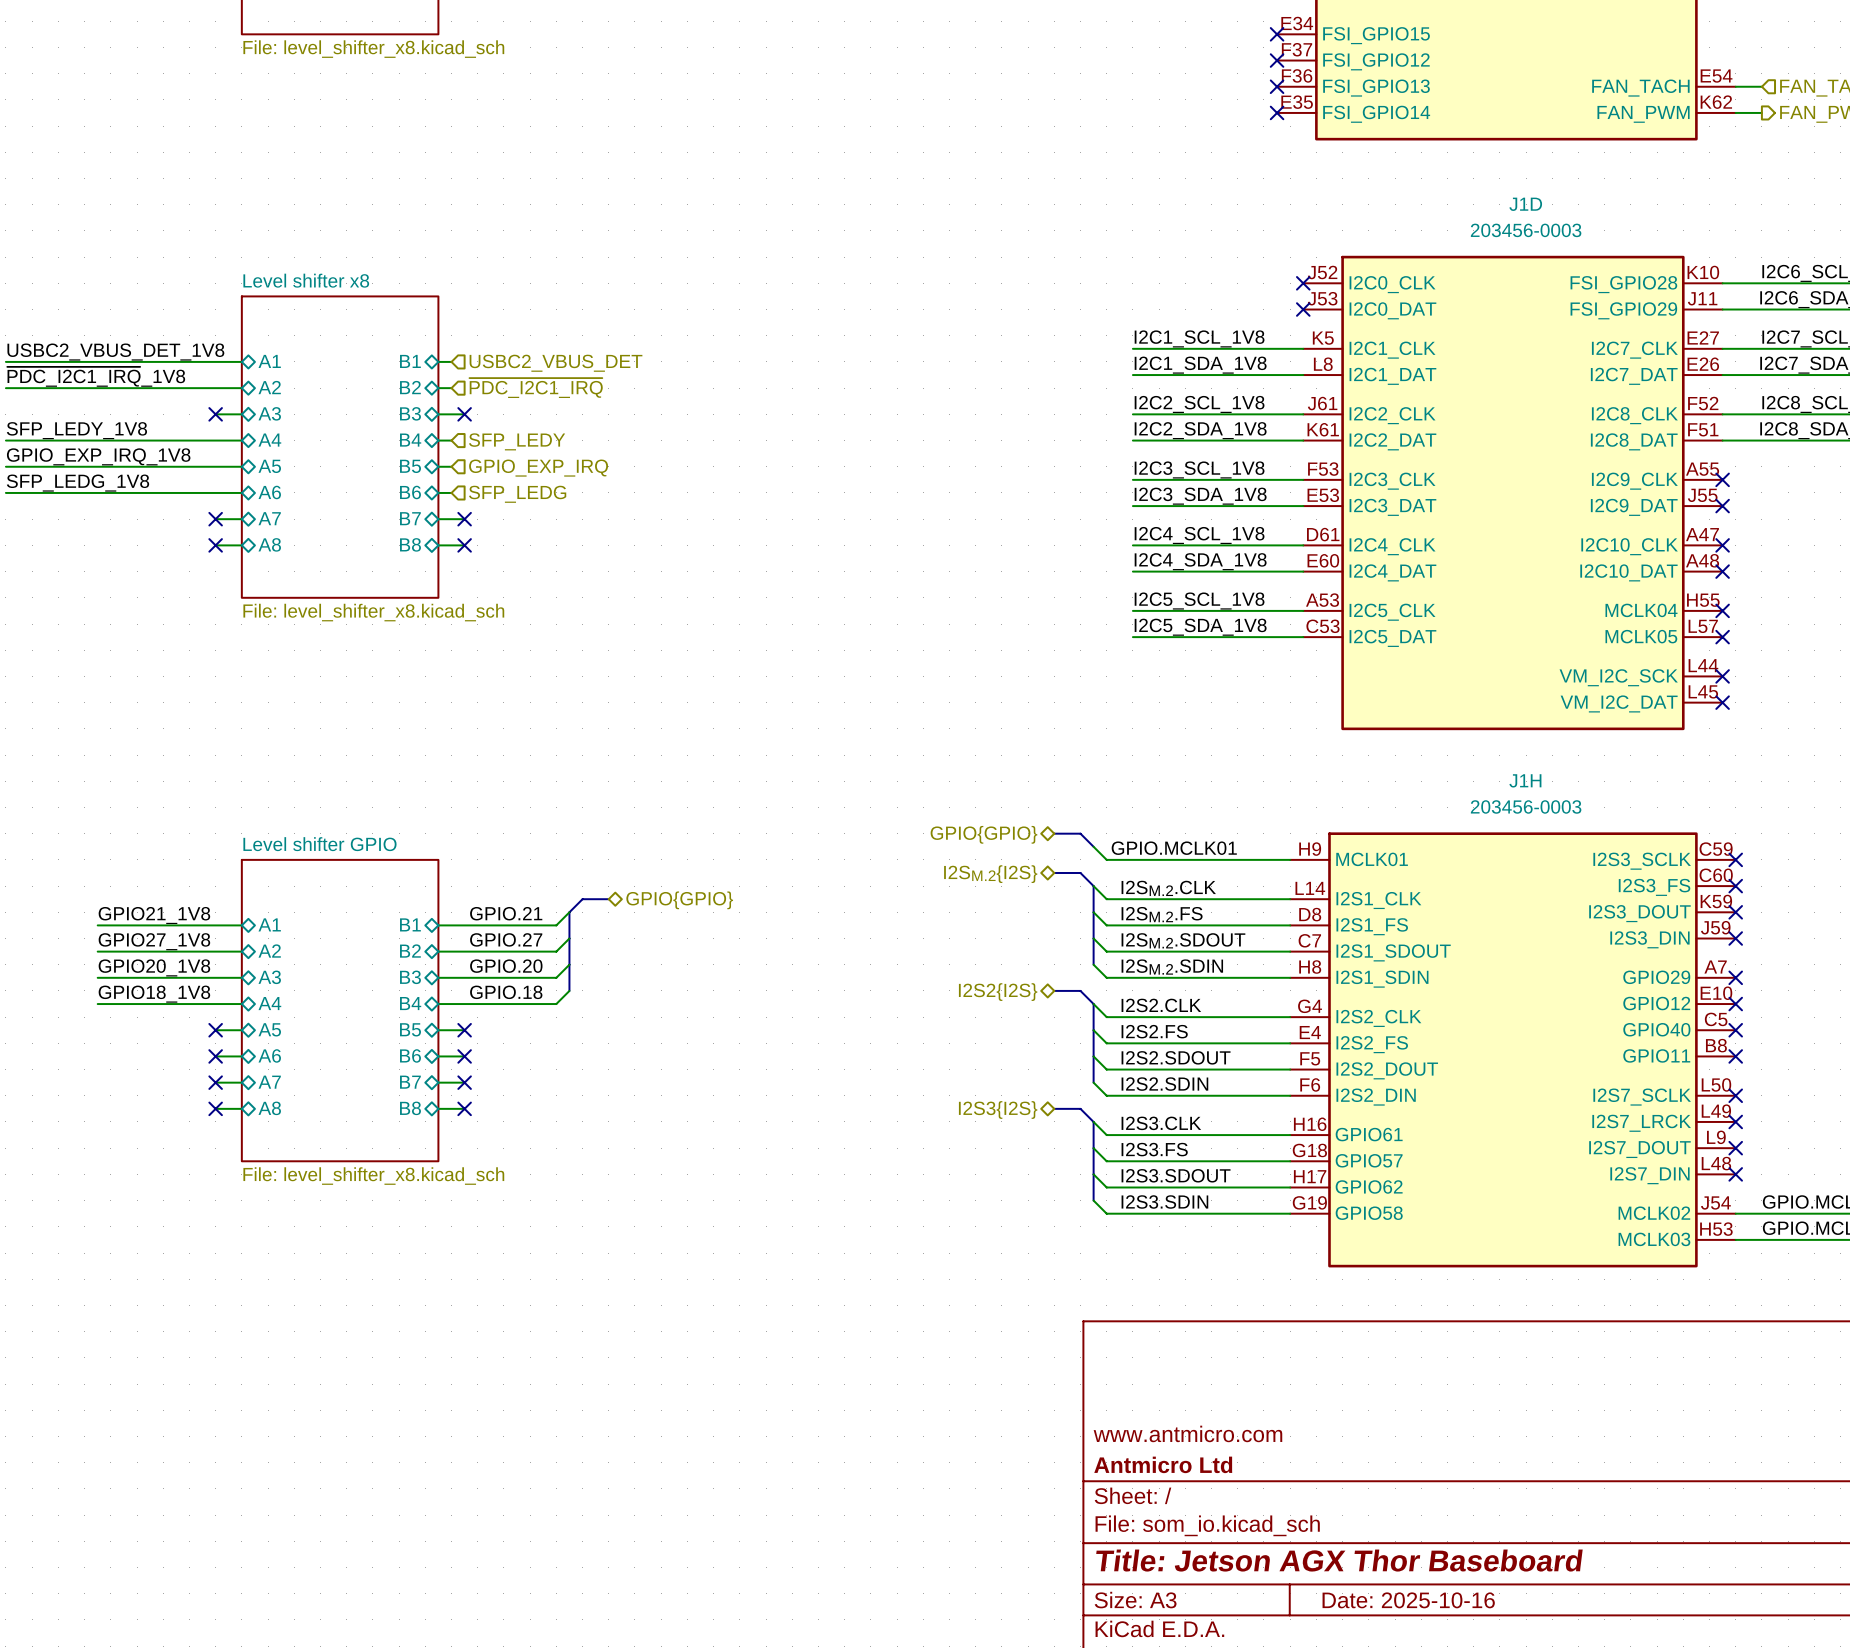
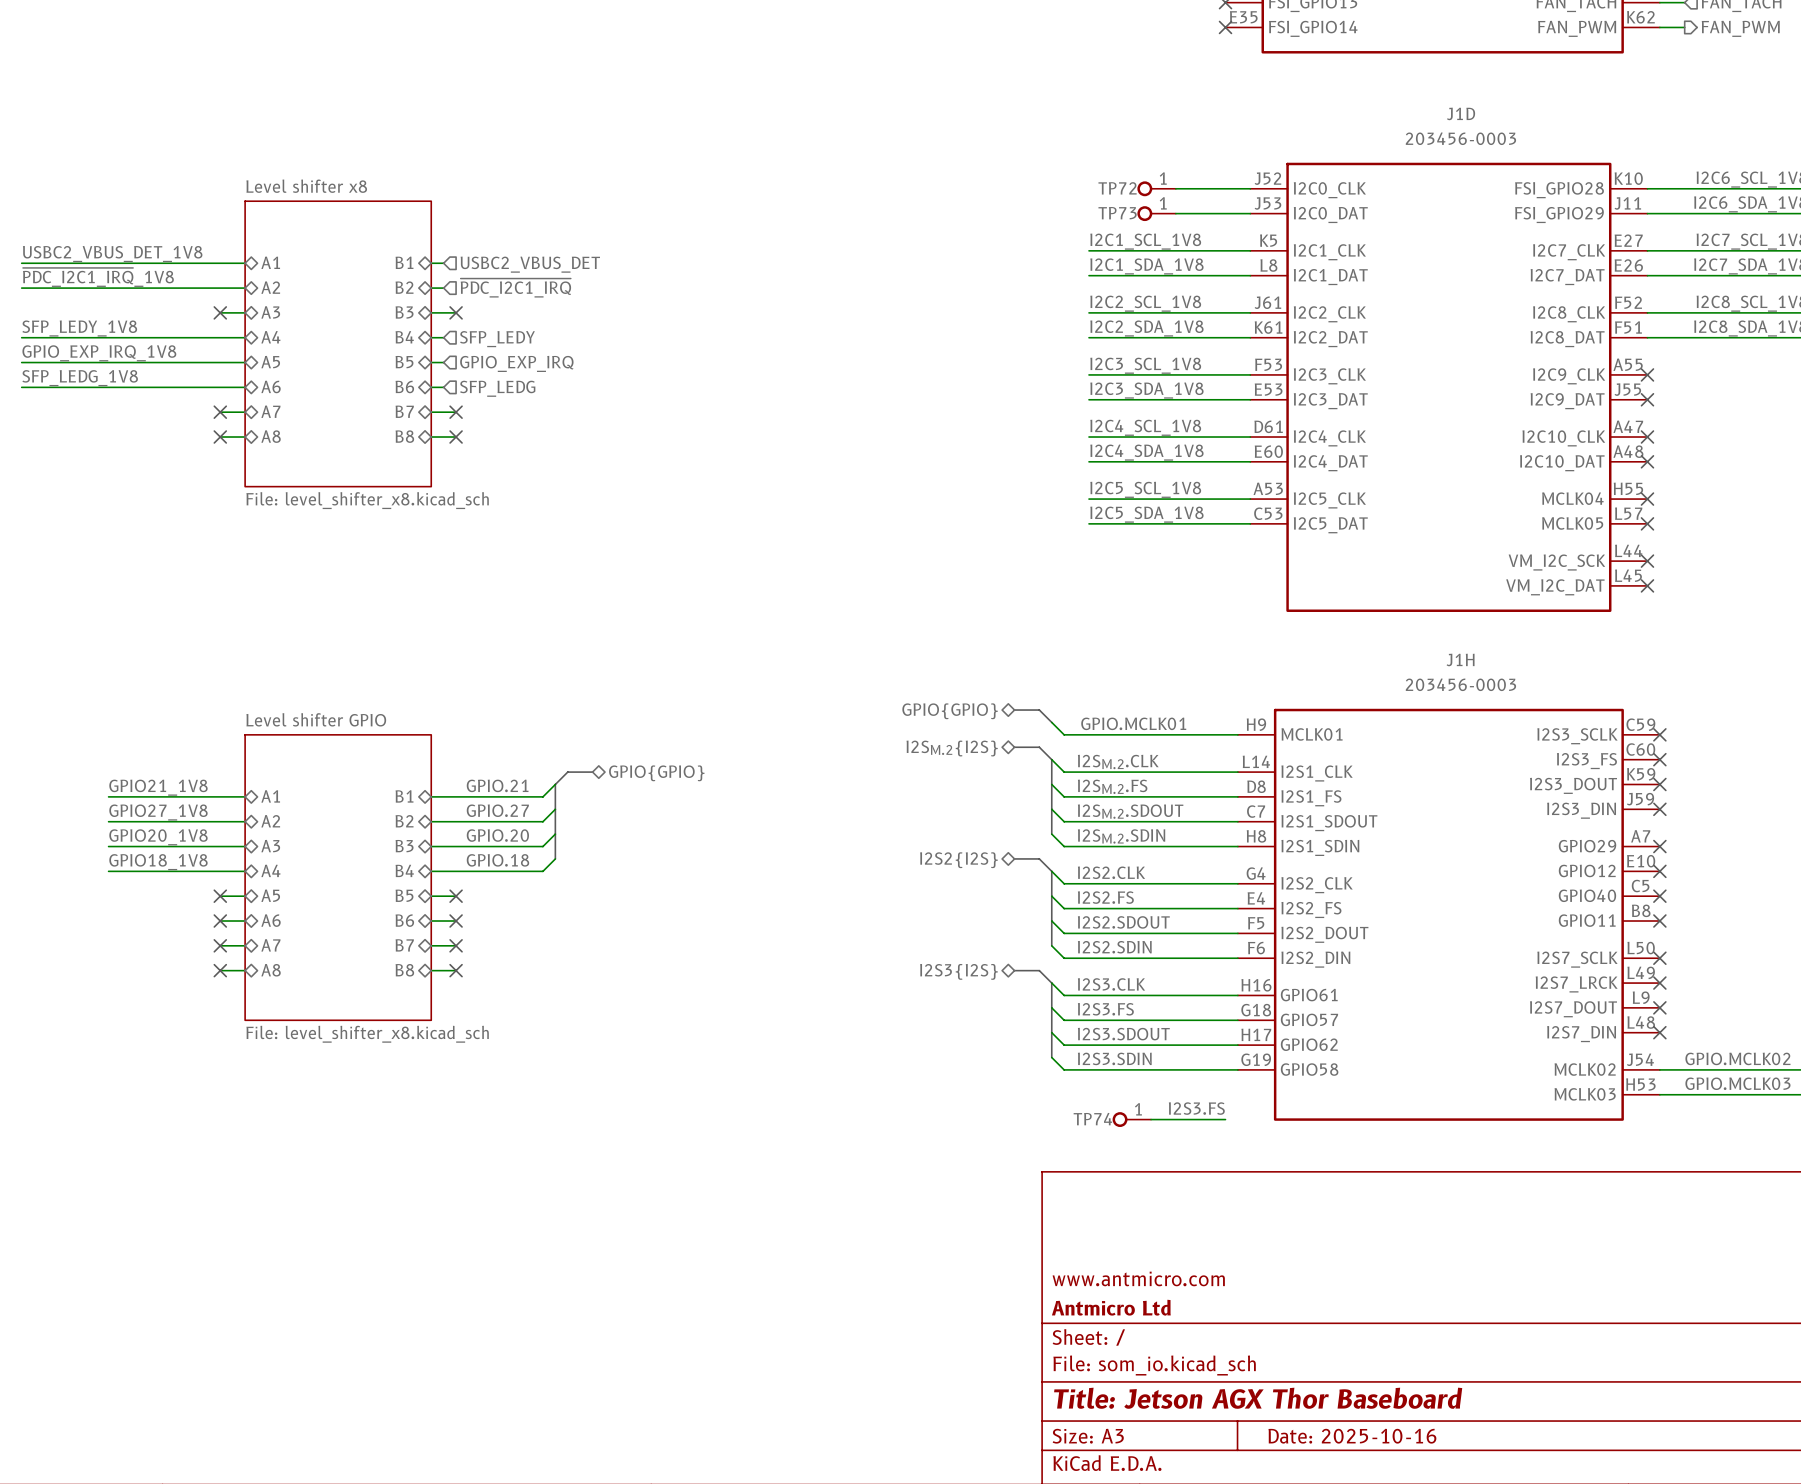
TP72: none -> (1156, 188)
wire: none -> (1175, 188) (1250, 188)
no-connect mark: (1303, 283) -> none
TP73: none -> (1156, 213)
wire: none -> (1175, 213) (1250, 213)
no-connect mark: (1303, 309) -> none
label: none -> I2S3.FS (1196, 1108)
TP74: none -> (1131, 1119)
wire: none -> (1151, 1119) (1225, 1119)

